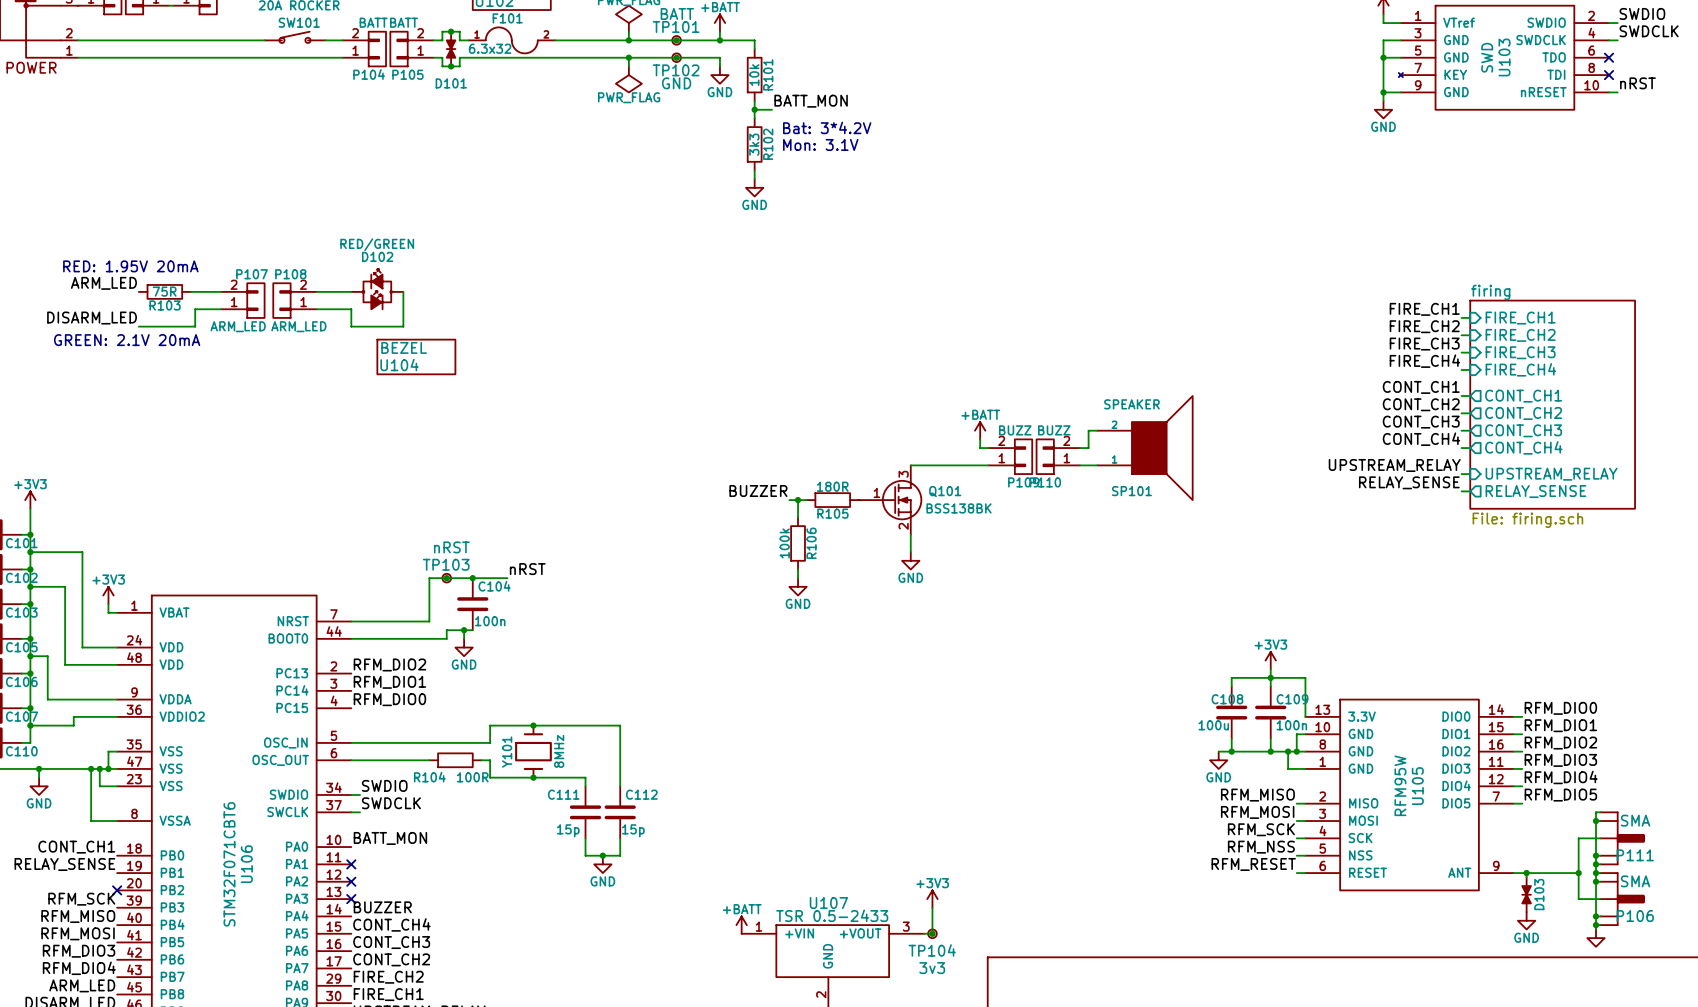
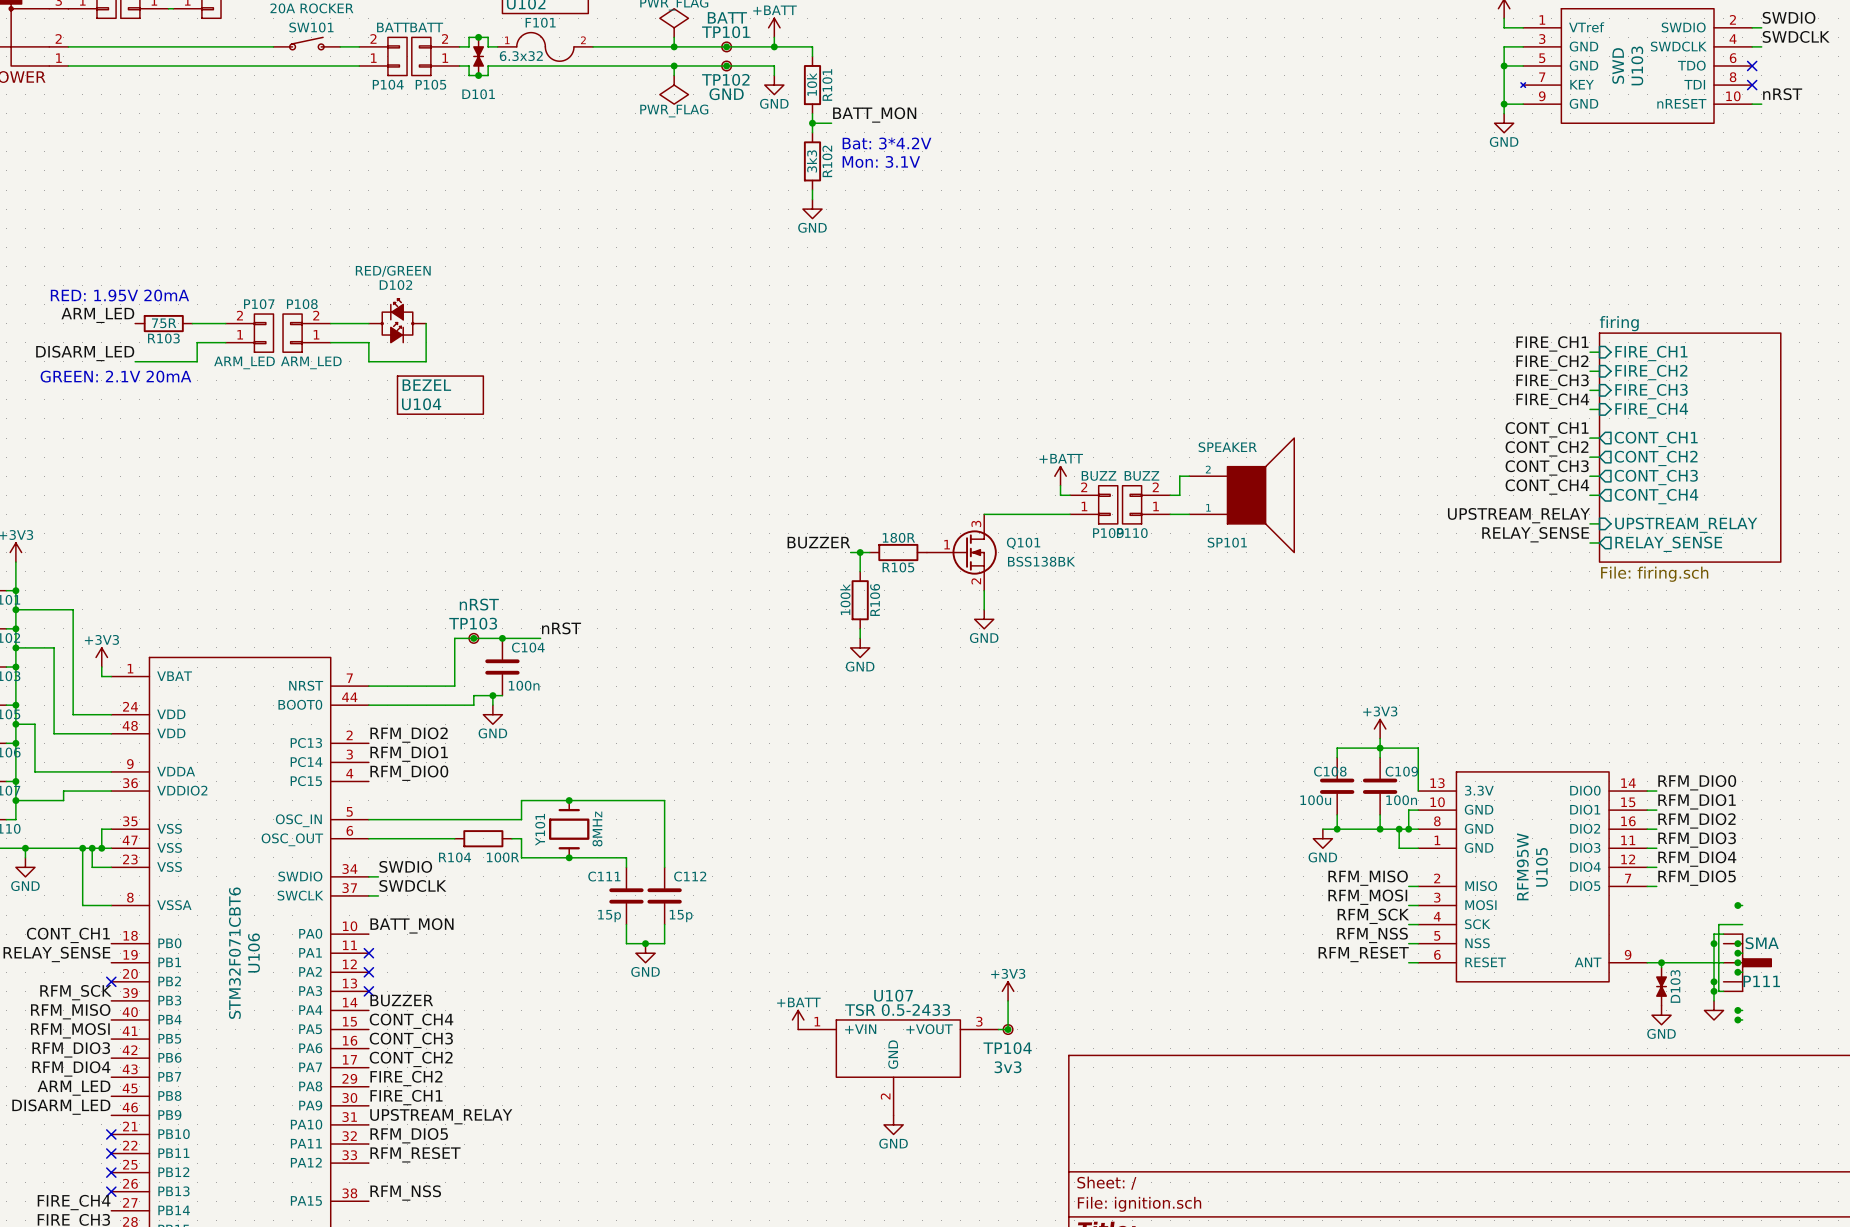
wire: (1600, 812) (1596, 812) (1596, 929) -> none
P111 position: (1622, 838) -> (1747, 962)
wire: none -> (1723, 934) (1714, 934) (1714, 1000)
junction: none -> (1714, 943)
junction: (1578, 873) -> none
junction: none -> (1714, 981)
junction: none -> (1714, 991)
P106: SMA (1622, 899) -> none
power symbol position: (1596, 938) -> (1714, 1010)

